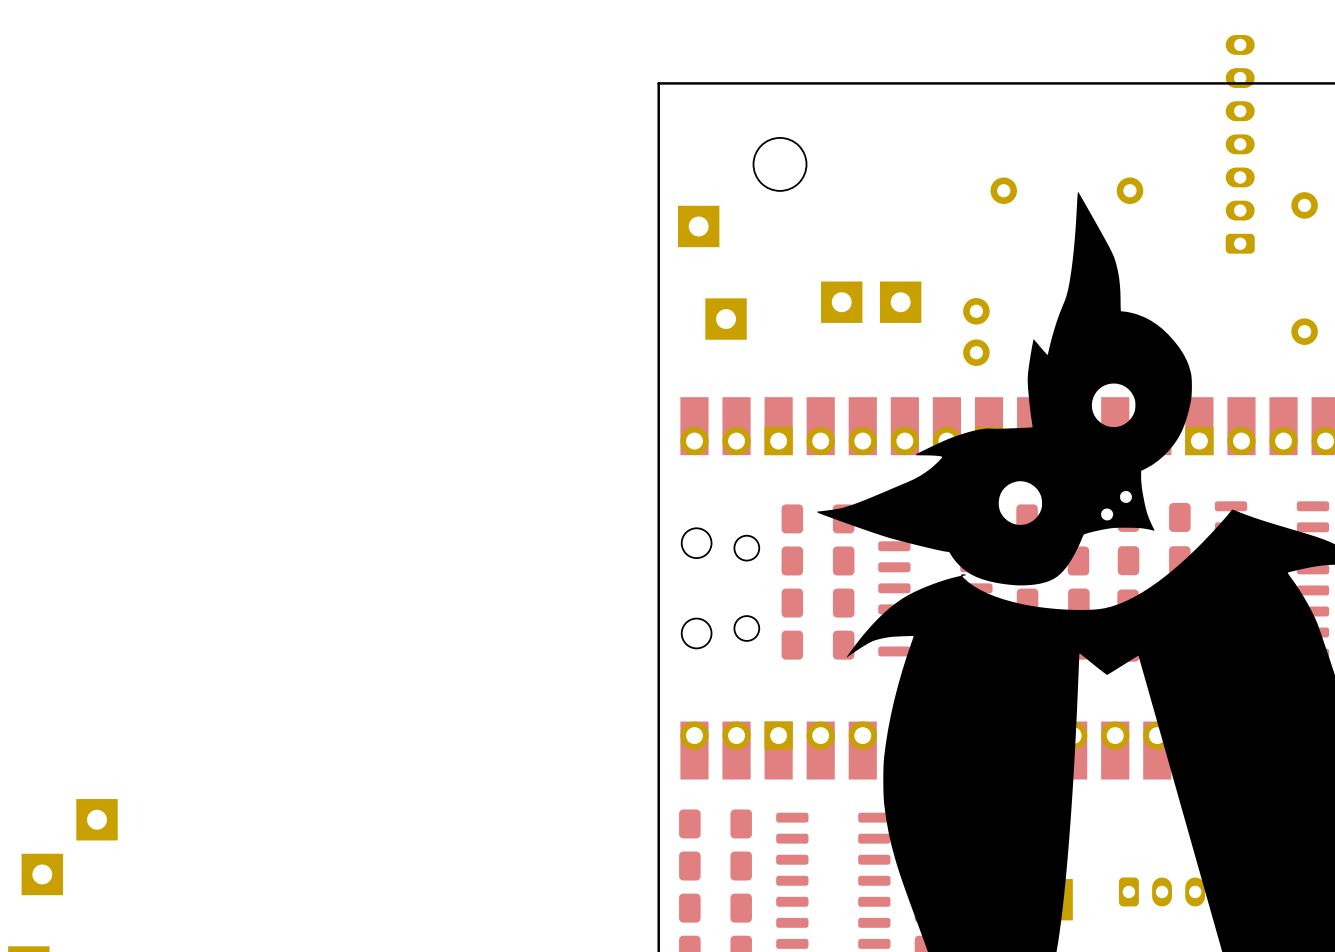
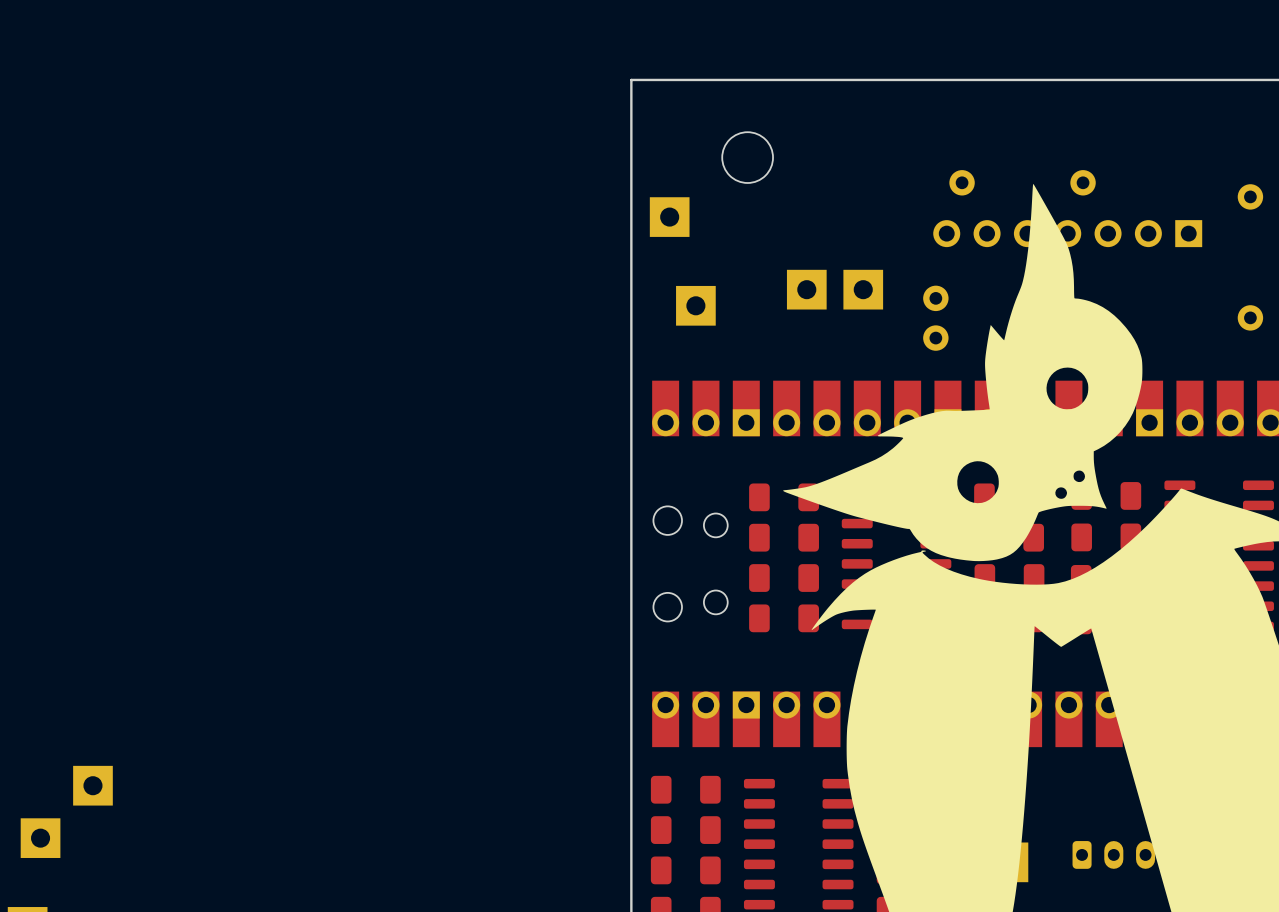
part: (1240, 144) -> none
part: none -> (1067, 233)

